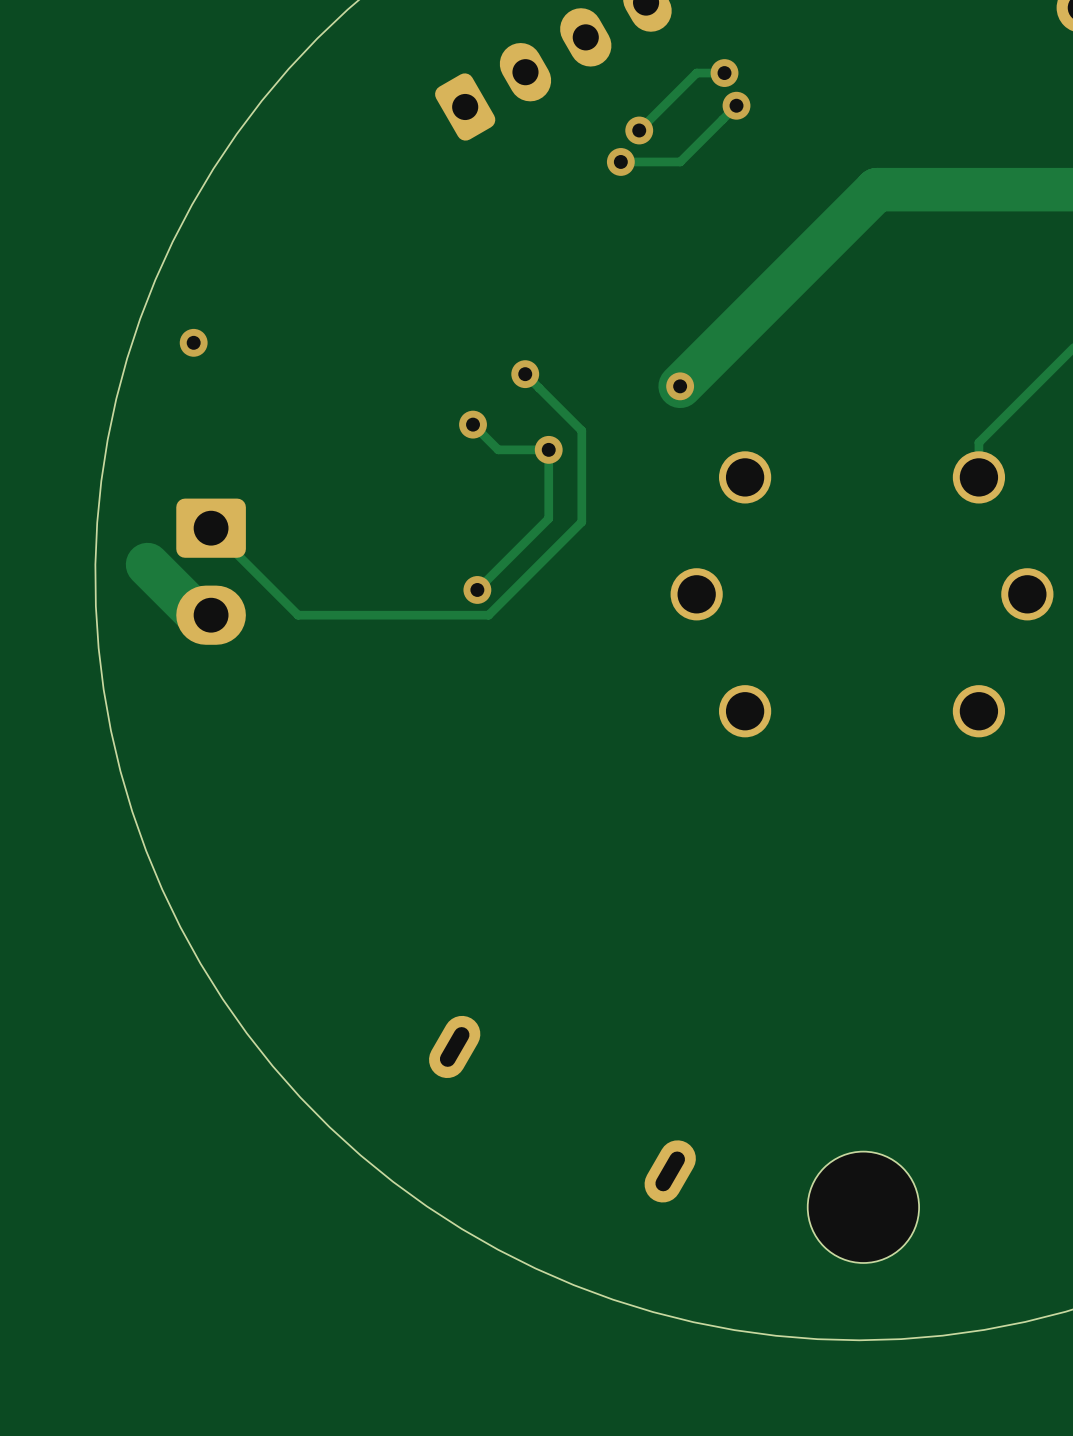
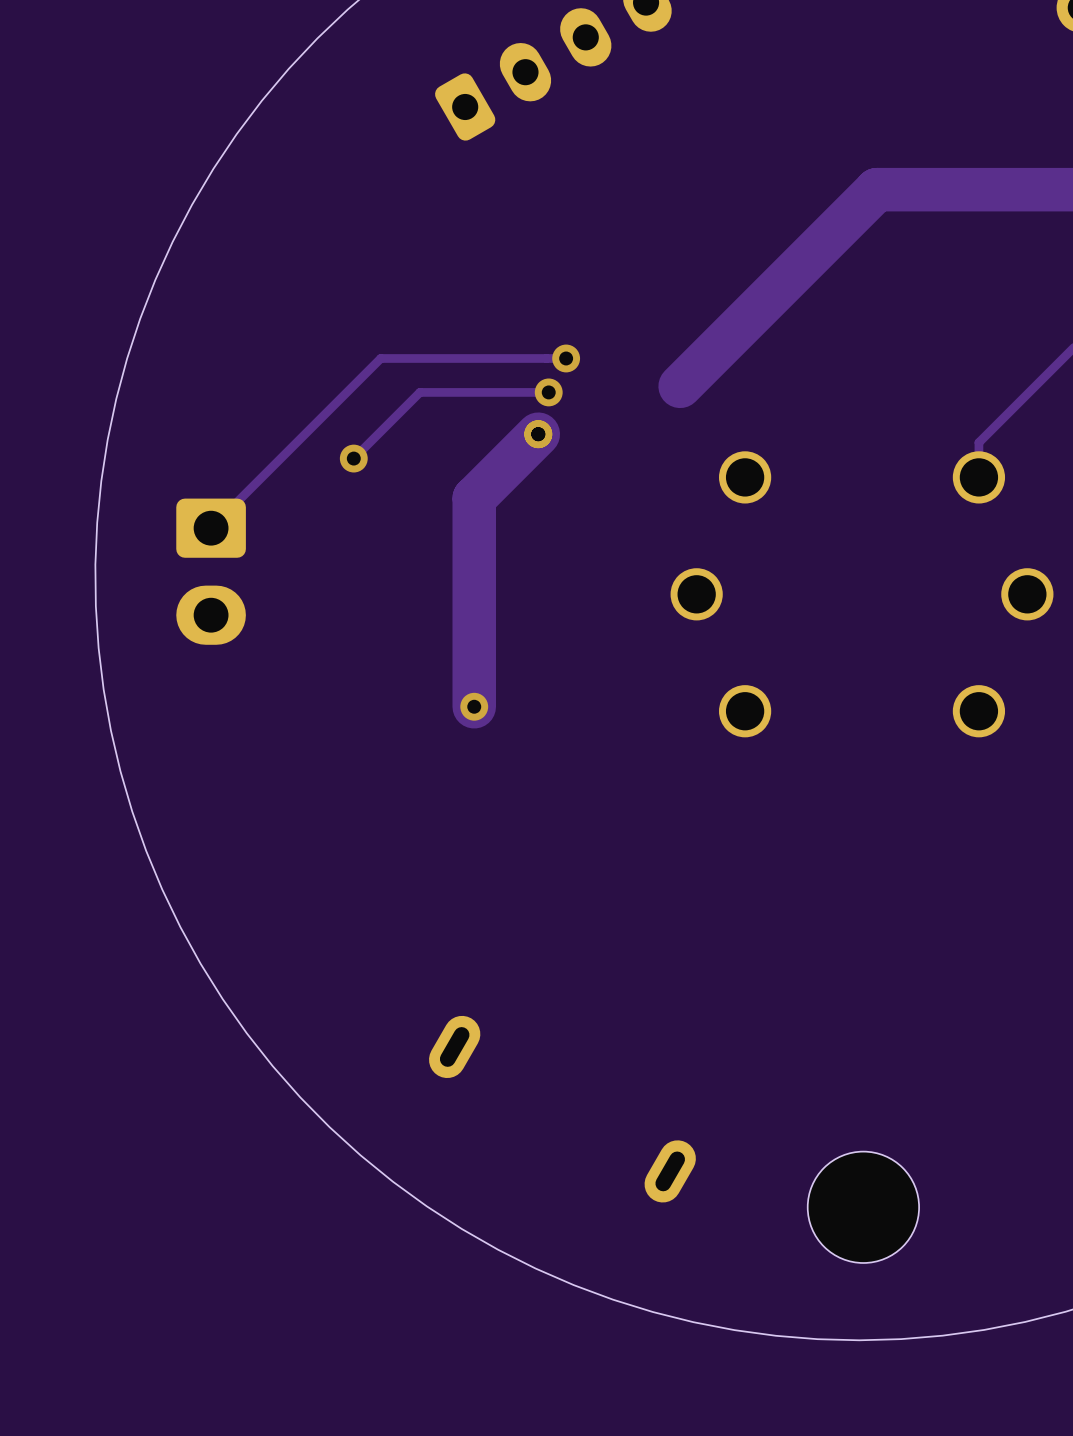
track: (724, 73) (696, 73) (639, 130) -> none
via: (724, 73) -> none
track: (736, 105) (680, 161) (620, 161) -> none
via: (736, 105) -> none
via: (639, 130) -> none
via: (620, 161) -> none
via: (193, 342) -> none
via: none -> (566, 358)
track: (525, 374) (581, 430) (581, 522) (488, 615) (298, 615) (211, 528) -> (566, 358) (380, 358) (211, 528)
via position: (525, 374) -> (548, 392)
via: (680, 386) -> none
track: none -> (548, 392) (419, 392) (353, 458)
track: (473, 424) (498, 449) (548, 449) (548, 518) (477, 589) -> none
via: (473, 424) -> none
track: none -> (538, 434) (474, 498) (474, 706)
via position: (548, 449) -> (538, 434)
via: none -> (353, 458)
track: (147, 564) (198, 615) (211, 615) -> none
via: (477, 589) -> none
via: none -> (474, 706)

